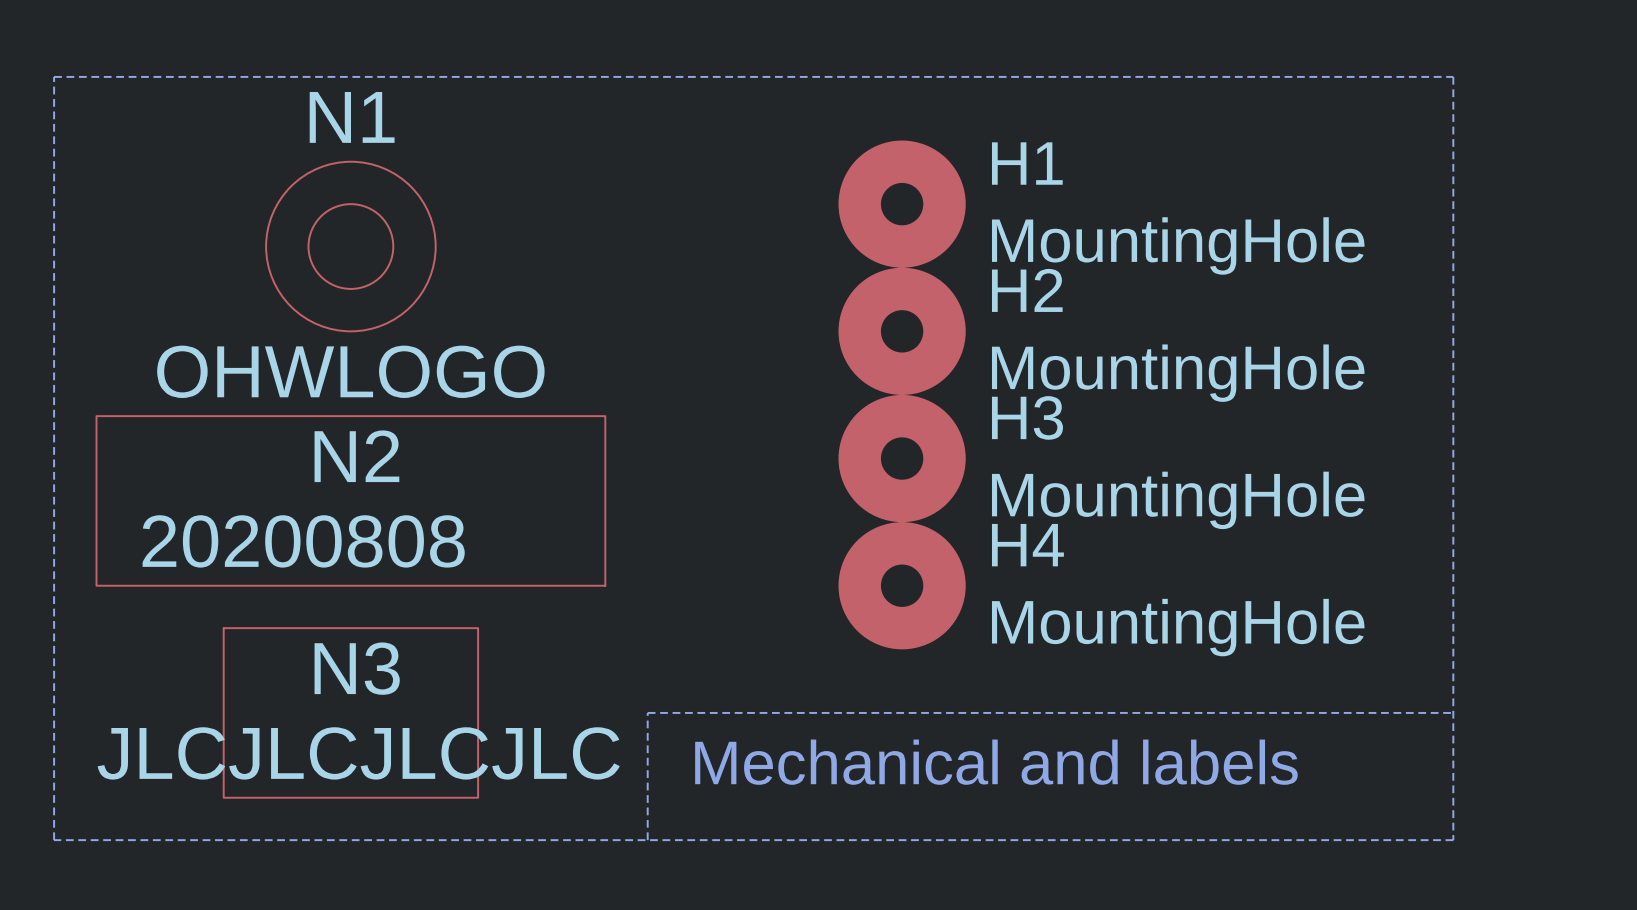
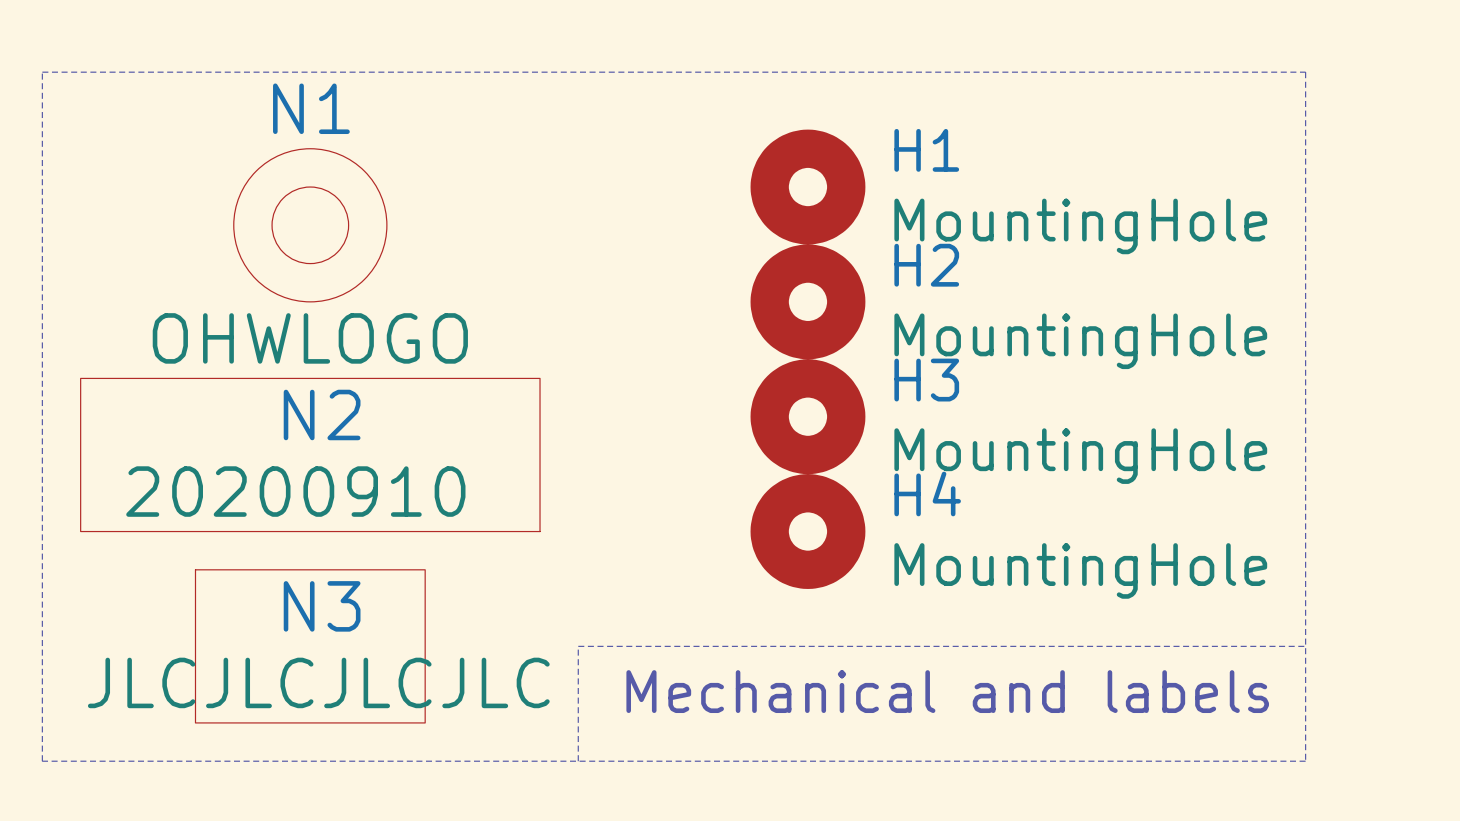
N2 value: 20200808 (303, 541) -> 20200910 (295, 491)

